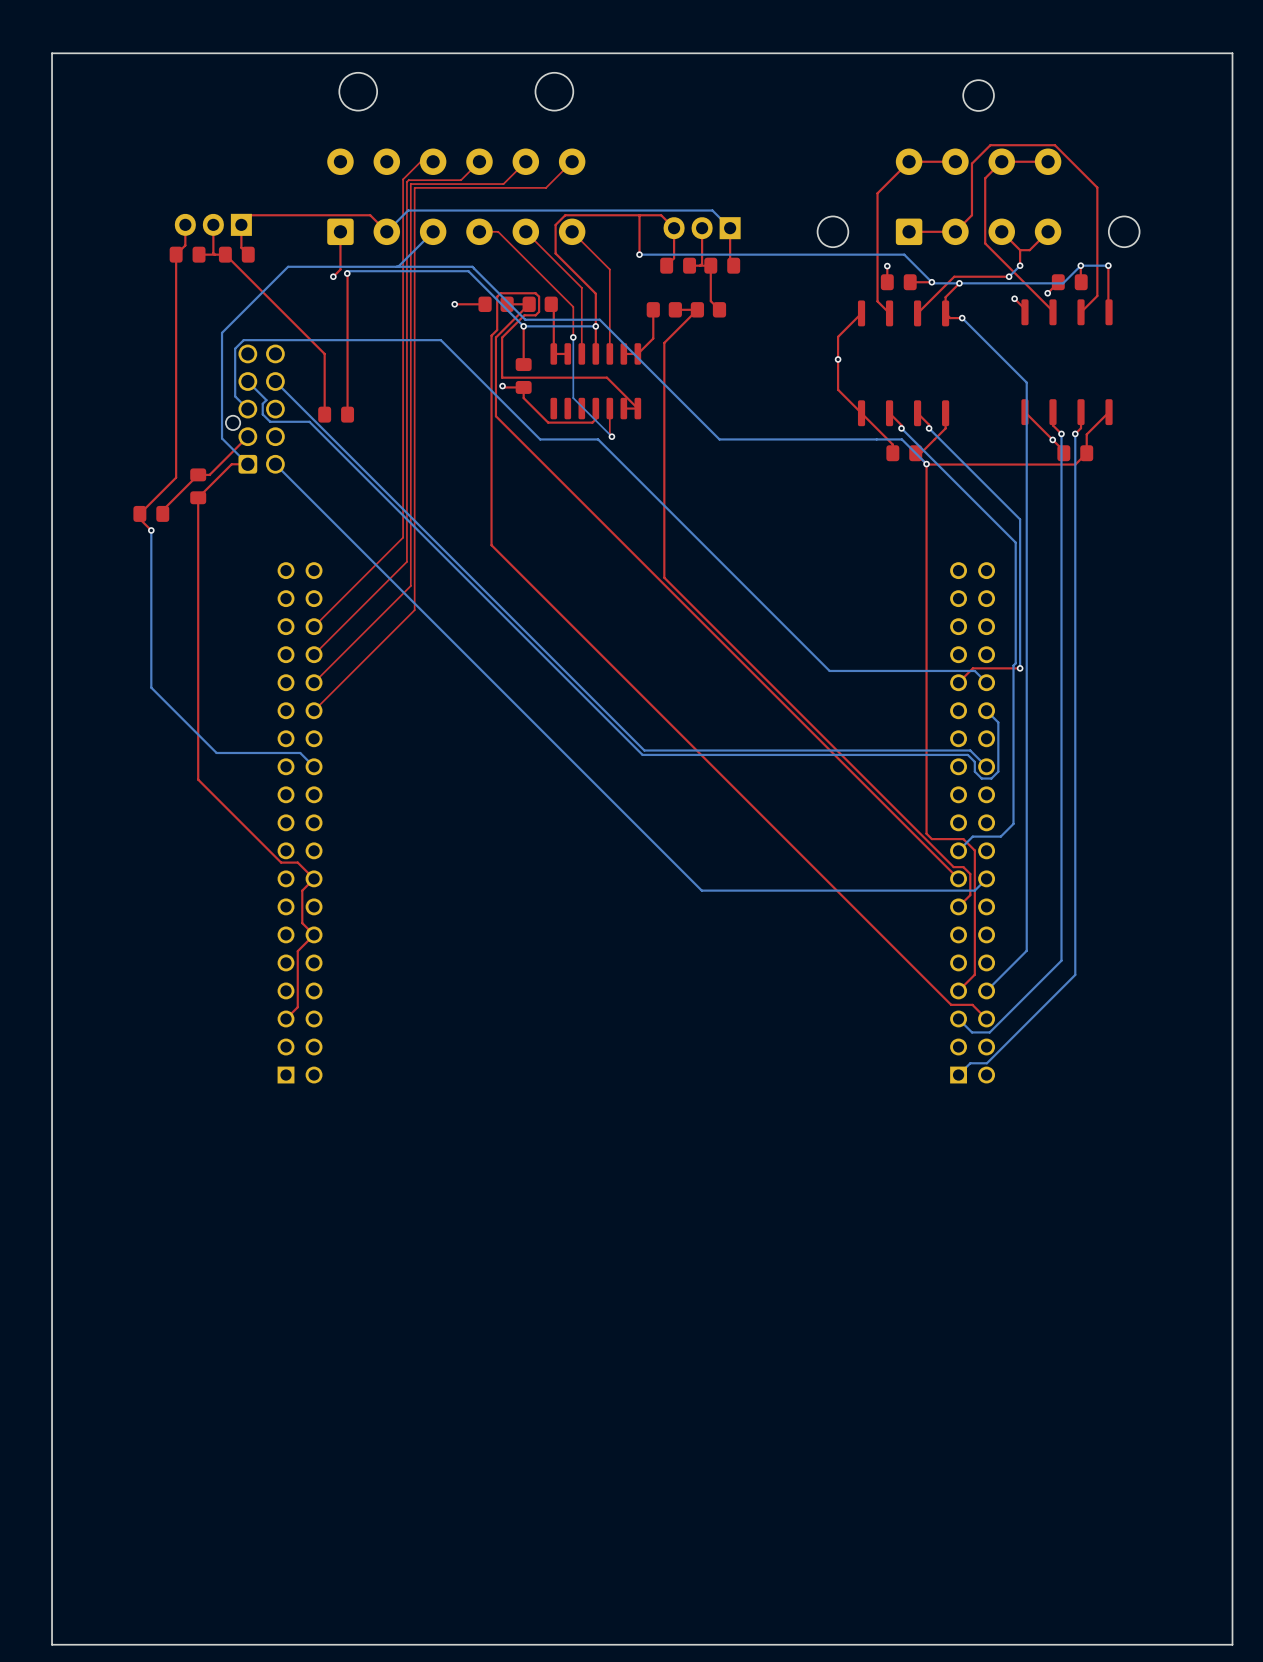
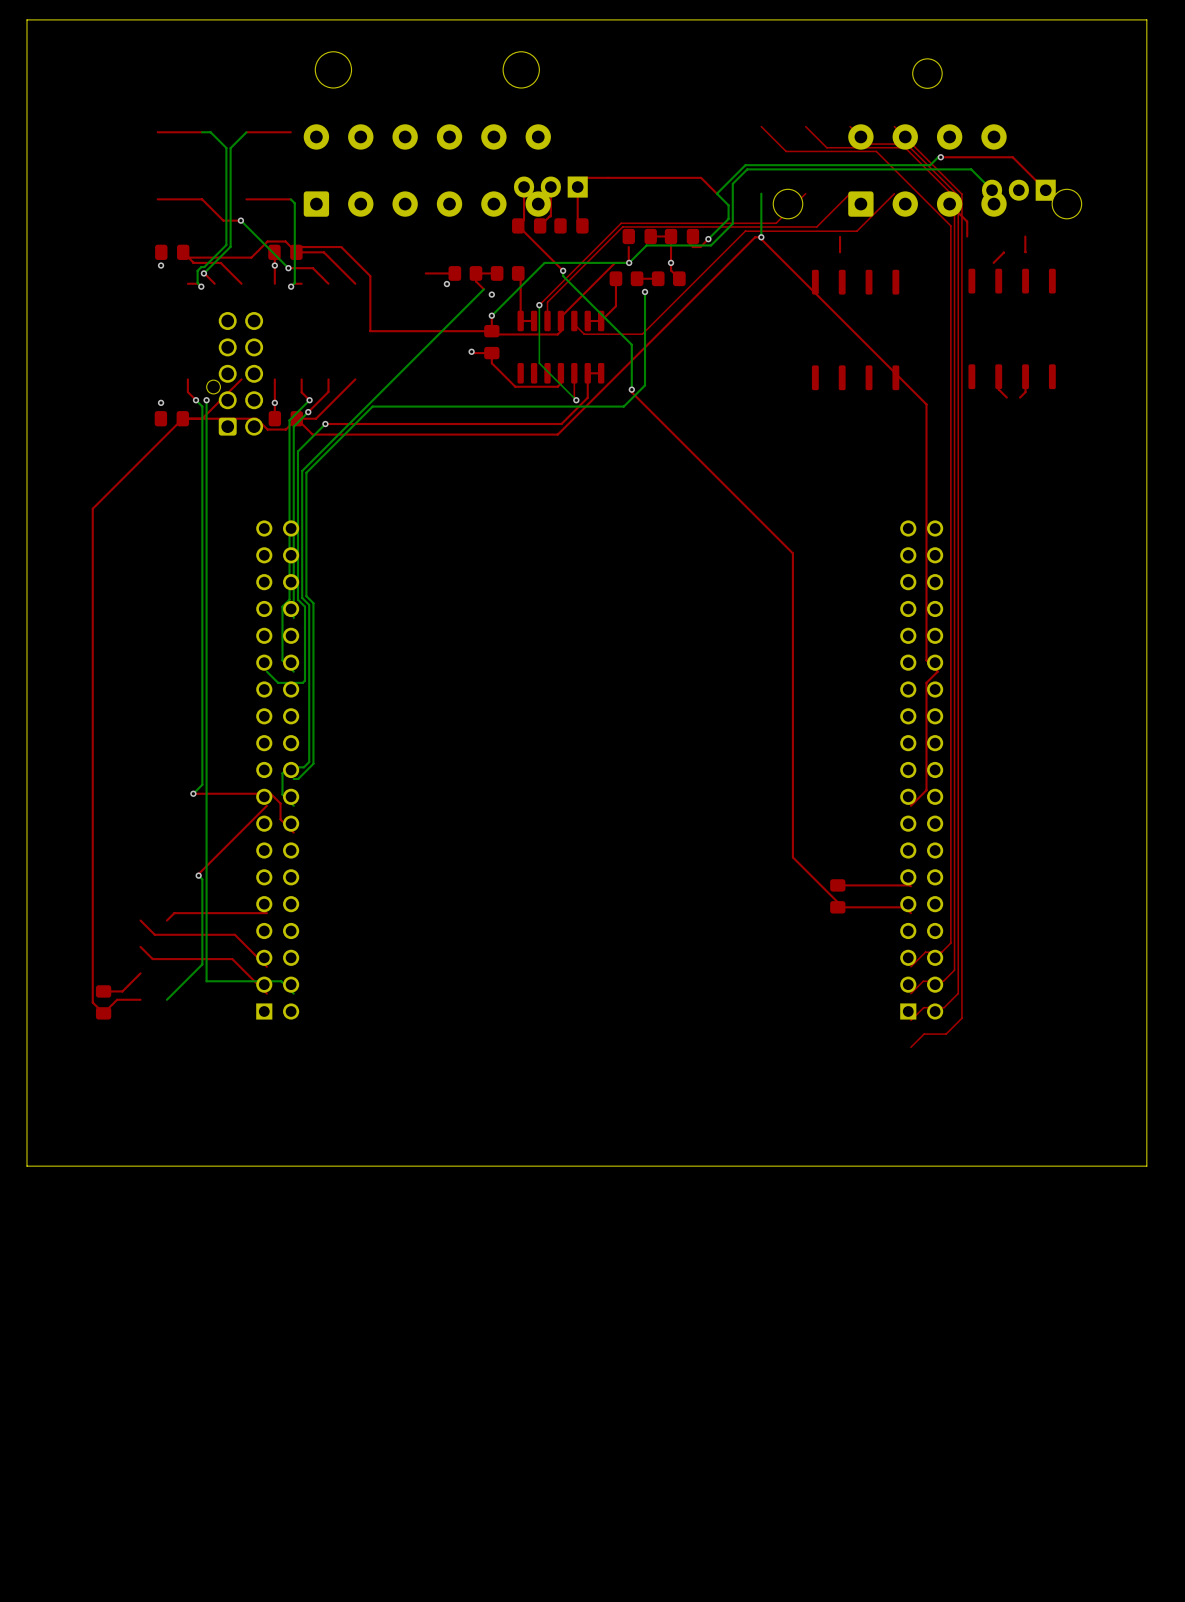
board edge: (1232, 53) (52, 53) (52, 1644) (1232, 1644) (1232, 53) -> (1146, 19) (1146, 1166) (26, 1166) (26, 19) (1146, 19)
top track: none -> (761, 126) (786, 151) (876, 151) (950, 225) (950, 943) (941, 952) (925, 952) (910, 966)
top track: none -> (805, 126) (826, 147) (905, 147) (954, 197) (954, 970) (943, 981) (923, 981) (910, 993)
top track: none -> (850, 126) (867, 144) (906, 144) (958, 195) (958, 993) (944, 1007) (923, 1007) (910, 1020)
top track: none -> (894, 126) (961, 194) (961, 1018) (946, 1034) (924, 1034) (910, 1047)
top track: none -> (202, 132) (157, 132)
bottom track: none -> (202, 132) (210, 132) (226, 148) (226, 245) (204, 267) (197, 270) (197, 282) (201, 286)
bottom track: none -> (246, 132) (230, 148) (230, 246) (203, 273)
top track: none -> (290, 132) (246, 132)
top track: (433, 161) (420, 161) (403, 179) (403, 537) (314, 626) -> none
top track: (479, 161) (461, 180) (408, 180) (406, 181) (406, 561) (314, 654) -> none
top track: (525, 161) (503, 184) (410, 184) (410, 585) (314, 682) -> none
top track: (572, 161) (546, 187) (414, 187) (414, 610) (314, 710) -> none
top track: (955, 161) (909, 161) (877, 193) (877, 301) (889, 313) -> none
top track: (1048, 161) (1001, 161) (985, 178) (985, 243) (1053, 312) -> none
top track: none -> (940, 157) (1012, 157) (1045, 190)
bottom track: none -> (940, 157) (938, 157) (930, 165) (745, 165) (716, 193) (728, 205) (728, 218) (708, 239)
via: none -> (940, 157)
top track: none -> (524, 187) (524, 220) (518, 225) (563, 270)
top track: none -> (550, 187) (550, 216) (540, 225)
top track: (639, 215) (639, 254) -> none
bottom track: none -> (992, 190) (971, 169) (747, 169) (732, 183) (732, 223) (711, 245) (646, 245) (629, 262) (544, 262) (491, 315)
part: none -> (1018, 190)
top track: none -> (716, 193) (701, 177) (586, 177) (577, 187) (577, 221) (582, 225)
bottom track: none -> (761, 193) (761, 237)
top track: (185, 224) (185, 245) (176, 254) (176, 477) (139, 513) (139, 519) (151, 530) -> none
top track: (213, 224) (214, 254) -> none
part: (213, 224) -> none
top track: none -> (157, 199) (202, 199) (223, 220) (240, 220)
top track: none -> (290, 199) (246, 199)
bottom track: none -> (290, 199) (294, 203) (294, 282) (291, 286)
top track: (702, 228) (702, 263) (700, 265) -> none
part position: (702, 228) -> (550, 187)
top track: (730, 228) (730, 262) (733, 265) -> none
bottom track: (730, 228) (712, 210) (408, 210) (386, 231) -> none
top track: (340, 231) (340, 269) (333, 276) -> none
top track: (386, 231) (370, 215) (250, 215) (241, 224) (241, 247) (248, 254) -> none
bottom track: (437, 231) (433, 231) (398, 266) -> none
top track: (479, 231) (498, 231) (573, 306) (573, 337) -> (805, 193) (776, 223) (621, 223) (539, 305)
top track: (525, 231) (581, 287) (581, 334) -> (850, 193) (816, 226) (622, 226) (547, 302)
top track: (572, 231) (609, 269) (609, 353) -> (894, 193) (856, 231) (745, 231) (642, 334) (584, 334) (574, 324) (574, 321)
top track: (909, 231) (955, 231) (971, 215) (971, 163) (990, 145) (1054, 145) (1097, 187) (1097, 295) (1081, 312) -> none
top track: (1048, 231) (1029, 250) (1020, 250) -> none
bottom track: none -> (240, 220) (288, 268)
via: none -> (240, 220)
part: (187, 254) -> none
top track: (199, 254) (225, 254) (324, 353) (324, 414) -> none
part: (236, 254) -> none
part: none -> (529, 225)
part: none -> (571, 225)
bottom track: (639, 254) (904, 254) (932, 283) (1063, 283) (1080, 265) (1108, 265) -> none
via: (639, 254) -> none
top track: (666, 265) (674, 258) (674, 228) (661, 215) (565, 215) (555, 224) (555, 253) (595, 293) (595, 349) -> (628, 247) (629, 262) (615, 262) (560, 317)
bottom track: (1020, 265) (1009, 276) -> none
via: (1020, 265) -> none
via: (1080, 265) -> none
top track: (1108, 265) (1108, 305) -> none
via: (1108, 265) -> none
via: none -> (761, 237)
via: (887, 266) -> none
top track: none -> (708, 239) (700, 247) (692, 247) (689, 243)
via: none -> (708, 239)
top track: (347, 273) (347, 414) -> none
bottom track: (347, 273) (347, 271) (468, 271) (523, 326) (595, 326) -> none
via: (347, 273) -> none
via: (333, 276) -> none
top track: (1009, 276) (954, 276) (917, 313) -> none
via: (1009, 276) -> none
part: none -> (172, 252)
top track: none -> (183, 252) (193, 262) (220, 262) (241, 283)
top track: none -> (274, 252) (274, 283)
part: none -> (285, 252)
top track: none -> (296, 252) (301, 247) (341, 247) (370, 276) (370, 331) (491, 331) (495, 334) (557, 334) (560, 331) (560, 321)
top track: none -> (296, 252) (285, 241) (267, 241) (251, 257) (188, 257)
top track: none -> (296, 252) (323, 252) (355, 283)
part: (898, 282) -> none
top track: (931, 282) (910, 282) -> none
via: (931, 282) -> none
part: (1069, 282) -> none
top track: (959, 283) (945, 297) (945, 313) (950, 318) (962, 318) -> none
via: (959, 283) -> none
via: none -> (629, 262)
via: none -> (671, 262)
via: (1047, 293) -> none
via: none -> (161, 265)
via: none -> (274, 265)
top track: none -> (288, 268) (312, 268) (328, 283)
via: none -> (288, 268)
top track: (1014, 298) (1024, 309) (1024, 312) -> none
via: (1014, 298) -> none
bottom track: none -> (563, 270) (563, 276) (631, 344) (631, 389)
top track: none -> (203, 273) (214, 283)
via: none -> (203, 273)
via position: (454, 304) -> (446, 284)
top track: none -> (475, 273) (475, 281) (483, 289)
top track: (529, 304) (495, 337) (495, 416) (958, 878) -> none
top track: (697, 309) (664, 342) (664, 577) (953, 867) (963, 867) (970, 874) (970, 895) (958, 906) -> none
top track: (861, 313) (838, 336) (838, 389) (892, 444) (892, 453) -> none
top track: none -> (187, 283) (198, 283) (201, 286)
top track: none -> (301, 283) (294, 283) (291, 286)
via: none -> (201, 286)
via: none -> (291, 286)
bottom track: (962, 318) (1026, 382) (1026, 950) (986, 990) -> none
via: (962, 318) -> none
bottom track: none -> (483, 289) (302, 471) (302, 597) (309, 604) (309, 762) (303, 767) (288, 767) (282, 773) (282, 794) (293, 805)
bottom track: none -> (645, 291) (645, 385) (623, 406) (372, 406) (306, 472) (306, 596) (313, 603) (313, 763) (298, 778) (293, 778)
via: none -> (645, 291)
top track: (523, 326) (523, 348) -> none
via position: (595, 326) -> (563, 270)
via: none -> (491, 315)
via: (838, 359) -> none
bottom track: (247, 381) (266, 400) (262, 403) (262, 414) (270, 421) (309, 421) (642, 754) (967, 754) (974, 761) (974, 771) (981, 778) (991, 778) (998, 771) (998, 722) (986, 710) -> none
bottom track: (275, 381) (644, 750) (970, 750) (986, 766) -> none
top track: none -> (587, 373) (587, 397) (561, 424) (325, 424)
top track: (637, 408) (606, 377) (502, 377) (502, 337) (524, 315) (535, 315) (539, 311) (539, 296) (535, 293) (500, 293) (497, 296) (497, 330) (491, 335) (491, 545) (951, 1004) (972, 1004) (986, 1018) -> none
bottom track: (247, 409) (235, 396) (235, 348) (243, 340) (440, 340) (540, 439) (598, 439) (829, 670) (974, 670) (986, 682) -> none
top track: (1024, 412) (1063, 451) (1063, 453) -> none
top track: (1109, 412) (1086, 434) (1086, 453) (1075, 464) (927, 464) (915, 453) (920, 453) (945, 428) (945, 413) -> none
top track: (889, 413) (901, 425) (901, 428) -> none
top track: (917, 413) (929, 424) (929, 428) -> none
top track: none -> (187, 379) (187, 392) (196, 400)
top track: none -> (241, 379) (202, 418)
top track: none -> (274, 379) (274, 418)
top track: none -> (301, 379) (301, 392) (309, 400)
part position: (336, 414) -> (285, 418)
top track: none -> (328, 379) (328, 391) (308, 412)
top track: none -> (355, 379) (315, 418) (296, 418)
top track: none -> (631, 389) (631, 392) (792, 553) (792, 857) (837, 902) (837, 907) (905, 907) (910, 913)
via: none -> (631, 389)
bottom track: (901, 428) (1015, 542) (1013, 823) (1000, 836) (972, 836) (958, 850) -> none
via: (901, 428) -> none
bottom track: (929, 428) (1020, 519) (1020, 668) -> none
via: (929, 428) -> none
bottom track: (1061, 433) (1061, 960) (989, 1032) (972, 1032) (958, 1018) -> none
via: (1061, 433) -> none
bottom track: (1075, 433) (1075, 974) (986, 1063) (970, 1063) (958, 1075) -> none
via: (1075, 433) -> none
bottom track: none -> (196, 400) (202, 406) (202, 784) (193, 793)
via: none -> (196, 400)
bottom track: none -> (206, 400) (206, 981) (281, 981) (293, 993)
via: none -> (206, 400)
top track: (247, 436) (209, 474) (198, 474) (162, 510) (162, 513) -> none
bottom track: none -> (309, 400) (289, 420) (289, 599) (282, 606) (282, 660) (293, 671)
via: none -> (309, 400)
via: none -> (161, 402)
via: none -> (274, 402)
via: (1052, 439) -> none
bottom track: none -> (308, 412) (293, 426) (293, 617)
via: none -> (308, 412)
part: (904, 453) -> none
part: (1075, 453) -> none
top track: none -> (296, 418) (285, 429) (267, 429) (256, 418) (182, 418) (92, 508) (92, 1002) (103, 1013) (117, 999) (140, 999)
top track: none -> (296, 418) (312, 434) (557, 434) (755, 237) (761, 237) (926, 404) (926, 660) (937, 671) (926, 682) (926, 790) (910, 805)
bottom track: none -> (325, 424) (297, 451) (297, 599) (304, 606) (304, 680) (302, 682) (278, 682) (266, 671)
via: none -> (325, 424)
top track: (247, 464) (231, 464) (198, 497) (198, 779) (281, 862) (297, 862) (314, 878) (302, 890) (302, 923) (314, 934) (297, 951) (297, 1007) (286, 1018) -> none
bottom track: (275, 464) (701, 890) (974, 890) (986, 878) -> none
top track: (926, 464) (926, 833) (931, 839) (963, 839) (974, 850) (974, 974) (958, 990) -> none
bottom track: (926, 464) (901, 439) (719, 439) (599, 319) (525, 319) (472, 266) (288, 266) (222, 332) (222, 438) (247, 464) -> none
via: (926, 464) -> none
part rotation: 0° (198, 486) -> 90° clockwise (171, 418)
part position: (198, 486) -> (171, 418)
part: (151, 513) -> none
bottom track: (151, 530) (151, 687) (216, 752) (300, 752) (314, 766) -> none
via: (151, 530) -> none
top track: (1020, 668) (972, 668) (958, 682) -> none
via: (1020, 668) -> none
top track: none -> (193, 793) (270, 793) (280, 803) (280, 819) (293, 832)
via: none -> (193, 793)
top track: none -> (266, 805) (198, 875)
bottom track: none -> (198, 874) (202, 879) (202, 964) (166, 999)
via: none -> (198, 875)
top track: none -> (837, 885) (910, 886)
part: none -> (837, 896)
top track: none -> (266, 913) (174, 913) (166, 920)
top track: none -> (140, 920) (154, 934) (234, 934) (266, 966)
top track: none -> (140, 946) (152, 959) (232, 959) (266, 993)
top track: none -> (140, 973) (122, 991) (103, 991)
part: none -> (103, 1002)

